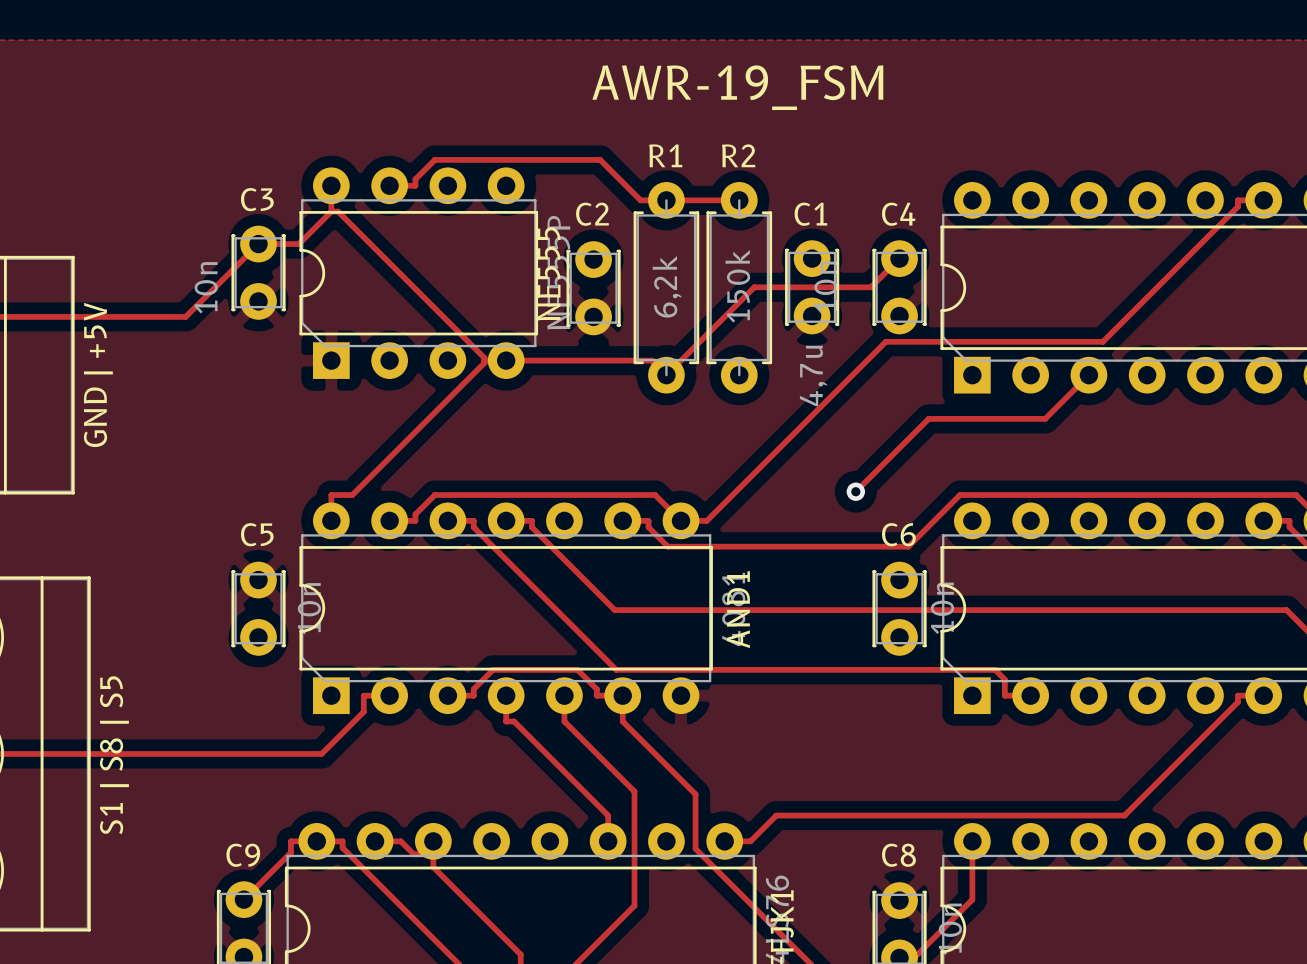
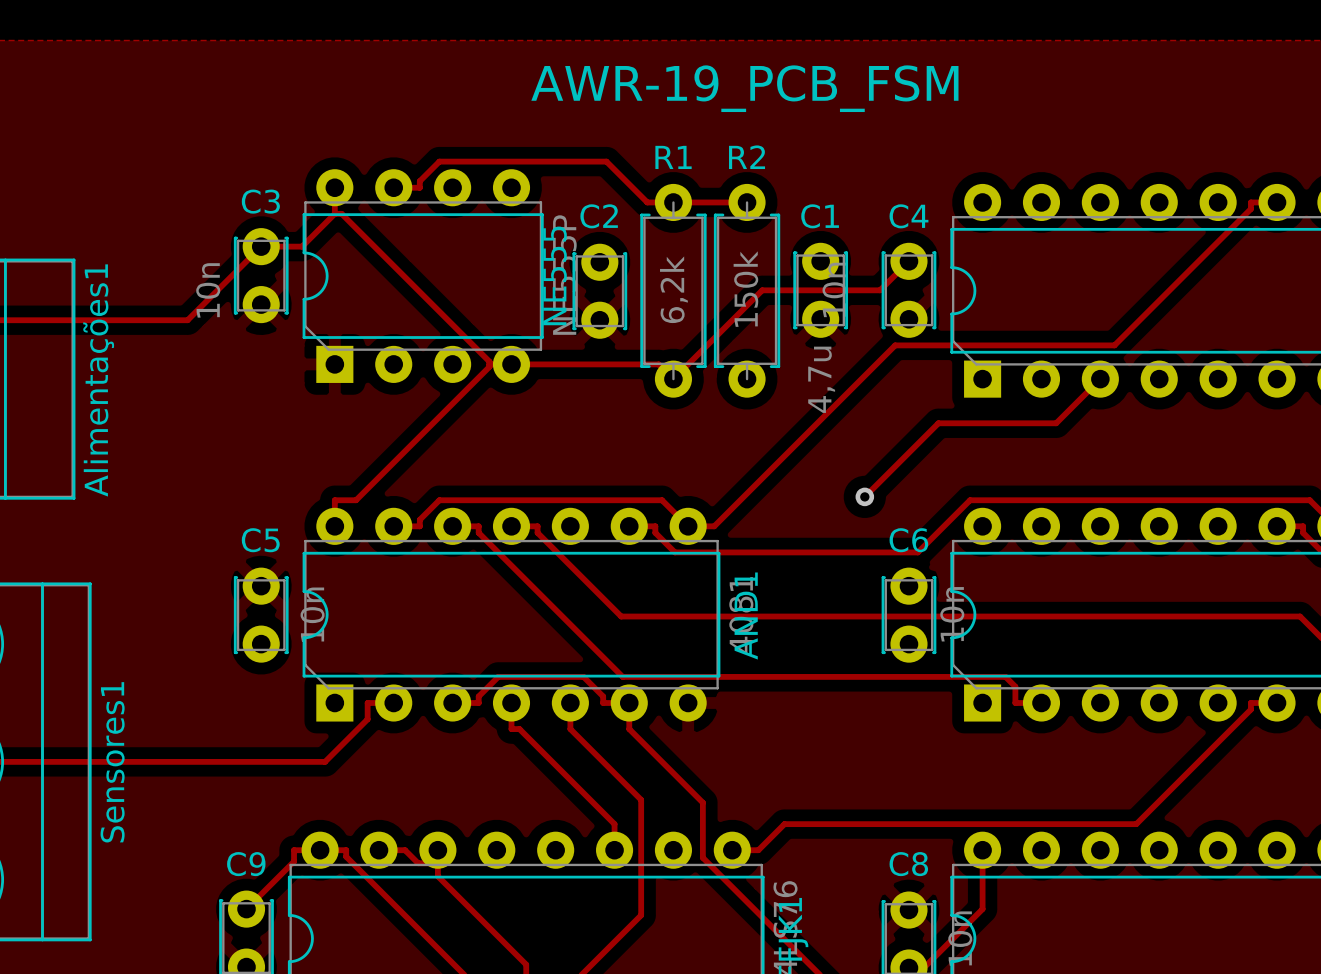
text: AWR-19_FSM (737, 87) -> AWR-19_PCB_FSM (744, 88)
GND | +5V name: GND | +5V (98, 374) -> Alimentações1 (98, 380)
S1 | S8 | S5 name: S1 | S8 | S5 (114, 755) -> Sensores1 (112, 762)

